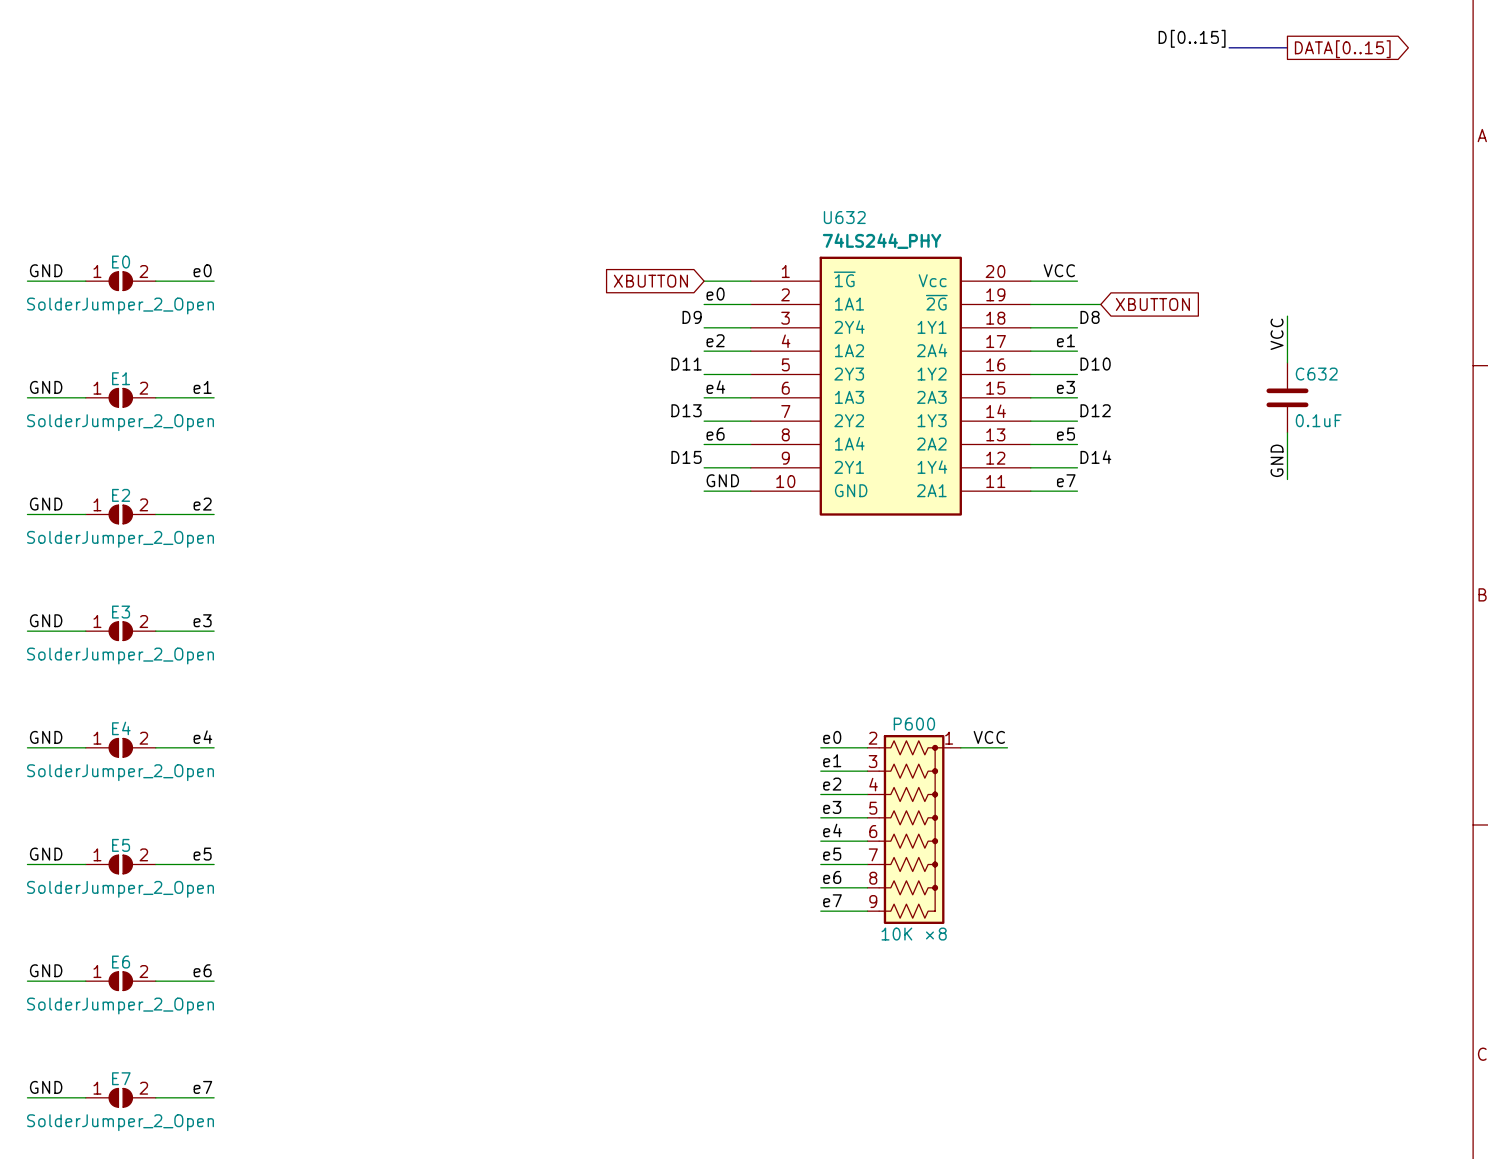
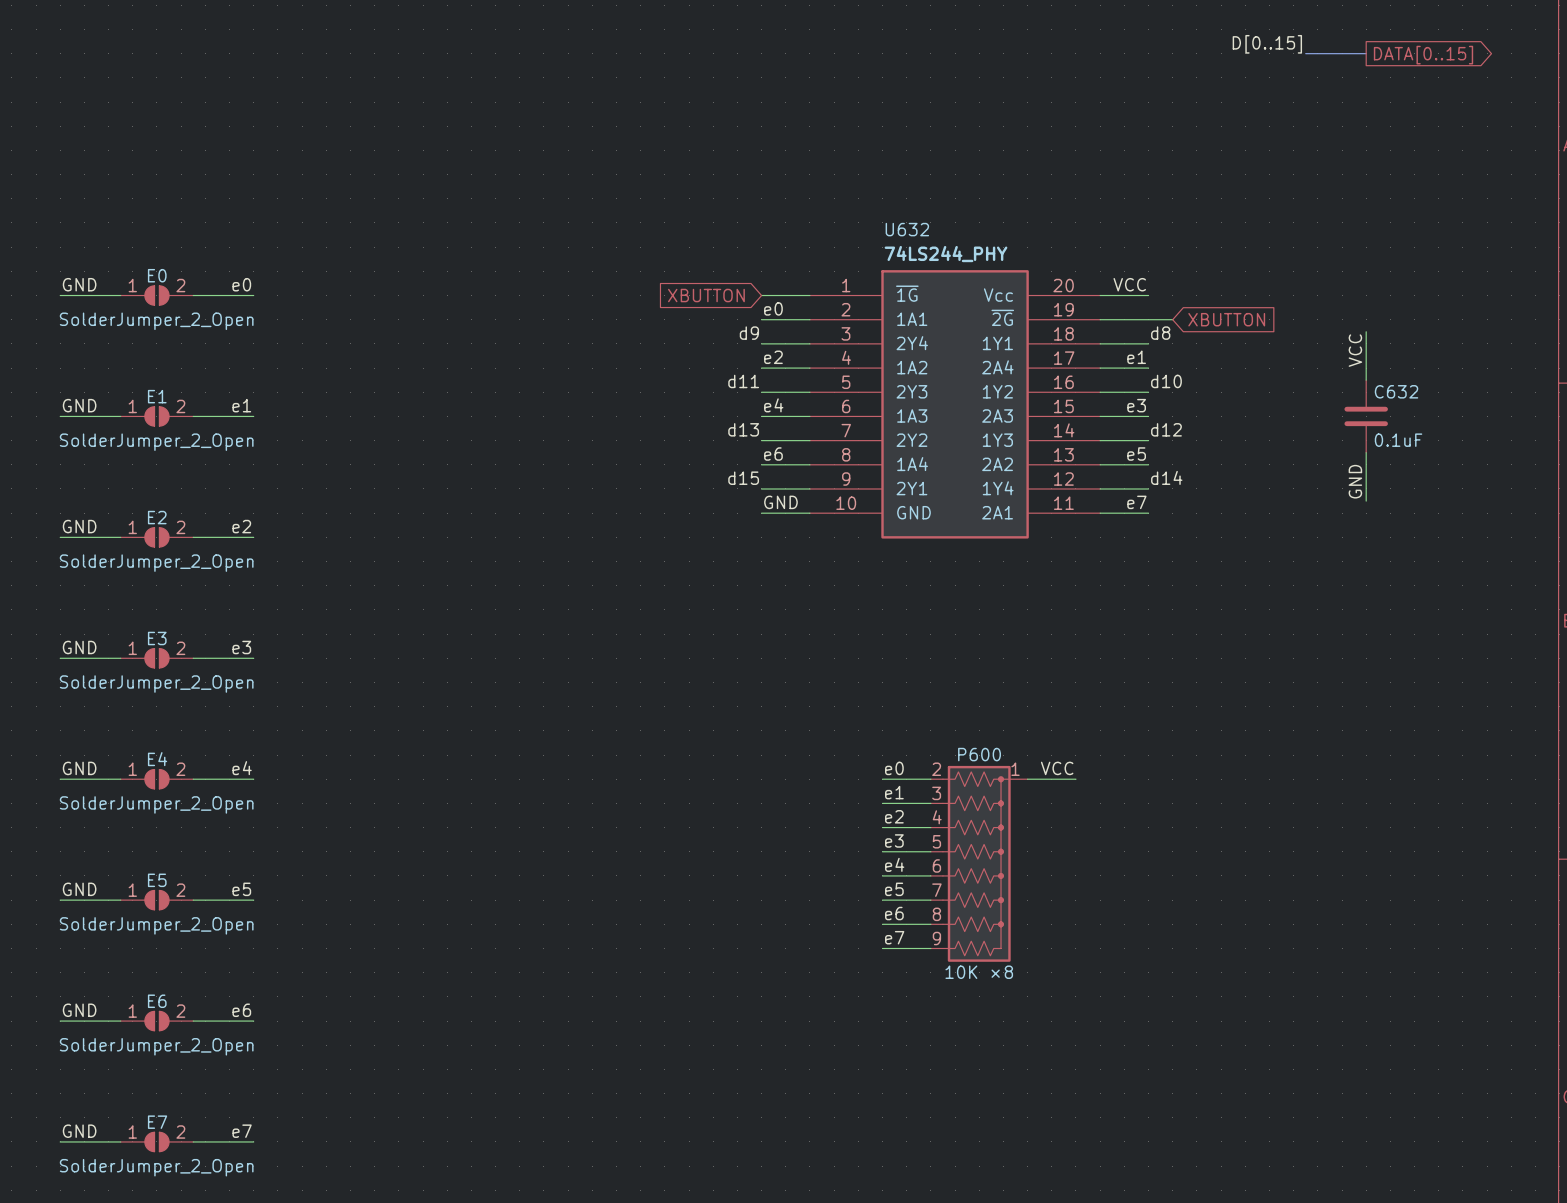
label: D9 (692, 317) -> d9 (749, 333)
label: D8 (1090, 317) -> d8 (1160, 333)
label: D11 (686, 364) -> d11 (743, 381)
label: D10 (1095, 364) -> d10 (1166, 381)
label: D13 (686, 410) -> d13 (743, 429)
label: D12 (1095, 410) -> d12 (1166, 429)
label: D15 (686, 457) -> d15 (743, 478)
label: D14 (1095, 457) -> d14 (1166, 477)

